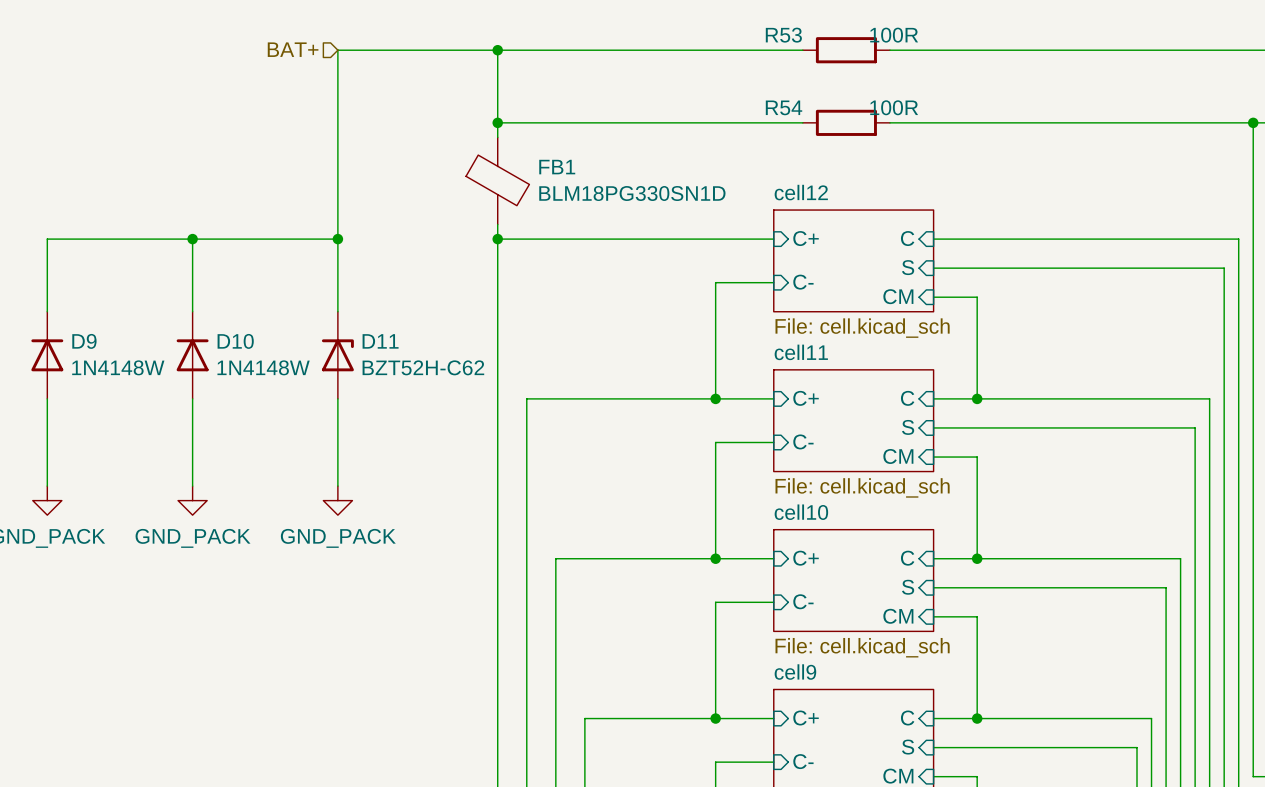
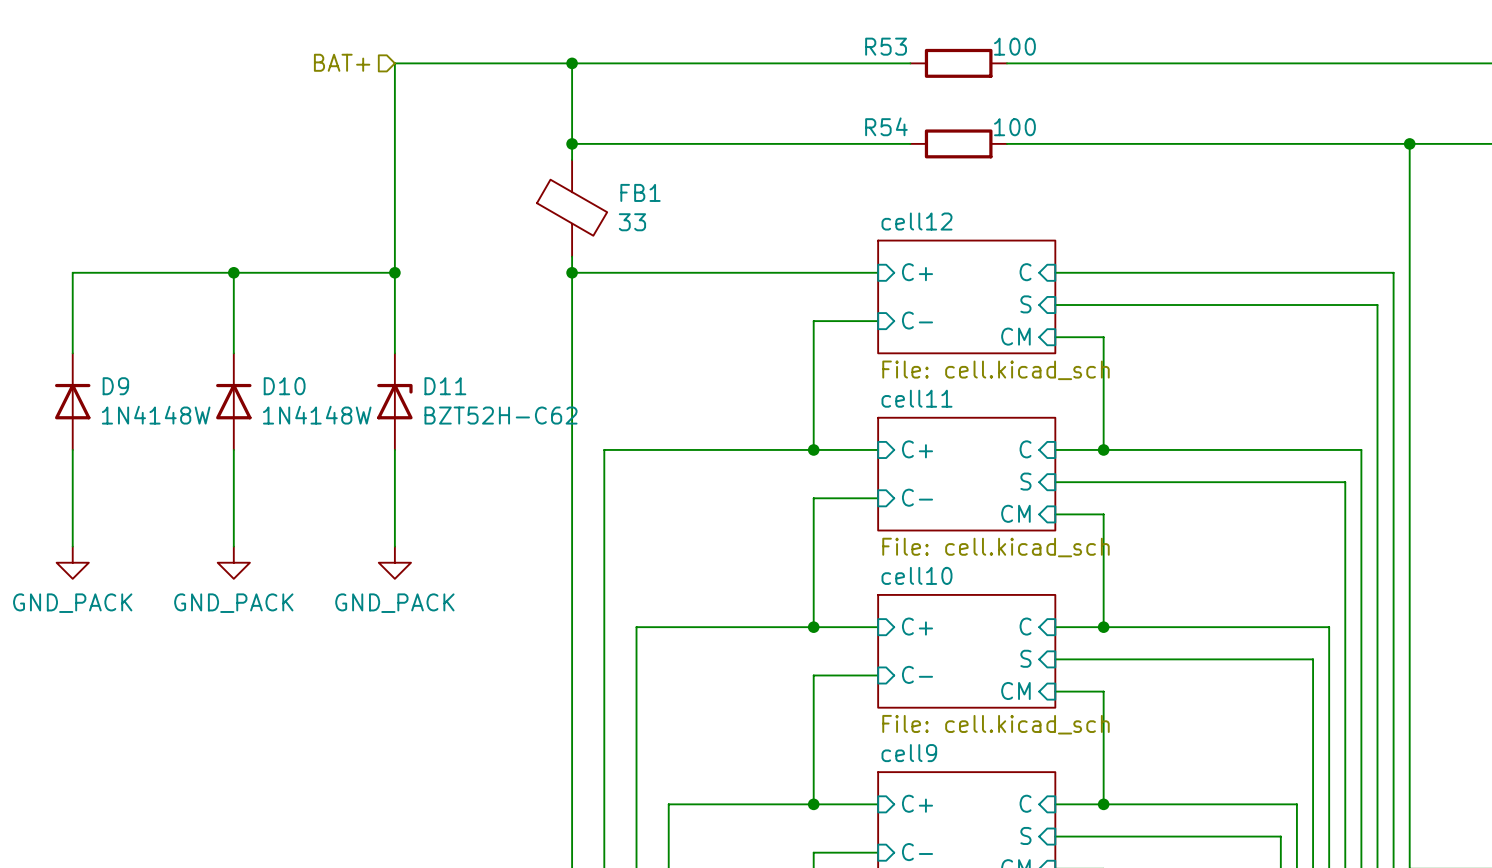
R53 value: 100R (894, 35) -> 100 (1014, 46)
R54 value: 100R (894, 107) -> 100 (1014, 127)
FB1 value: BLM18PG330SN1D (632, 193) -> 33 (632, 222)

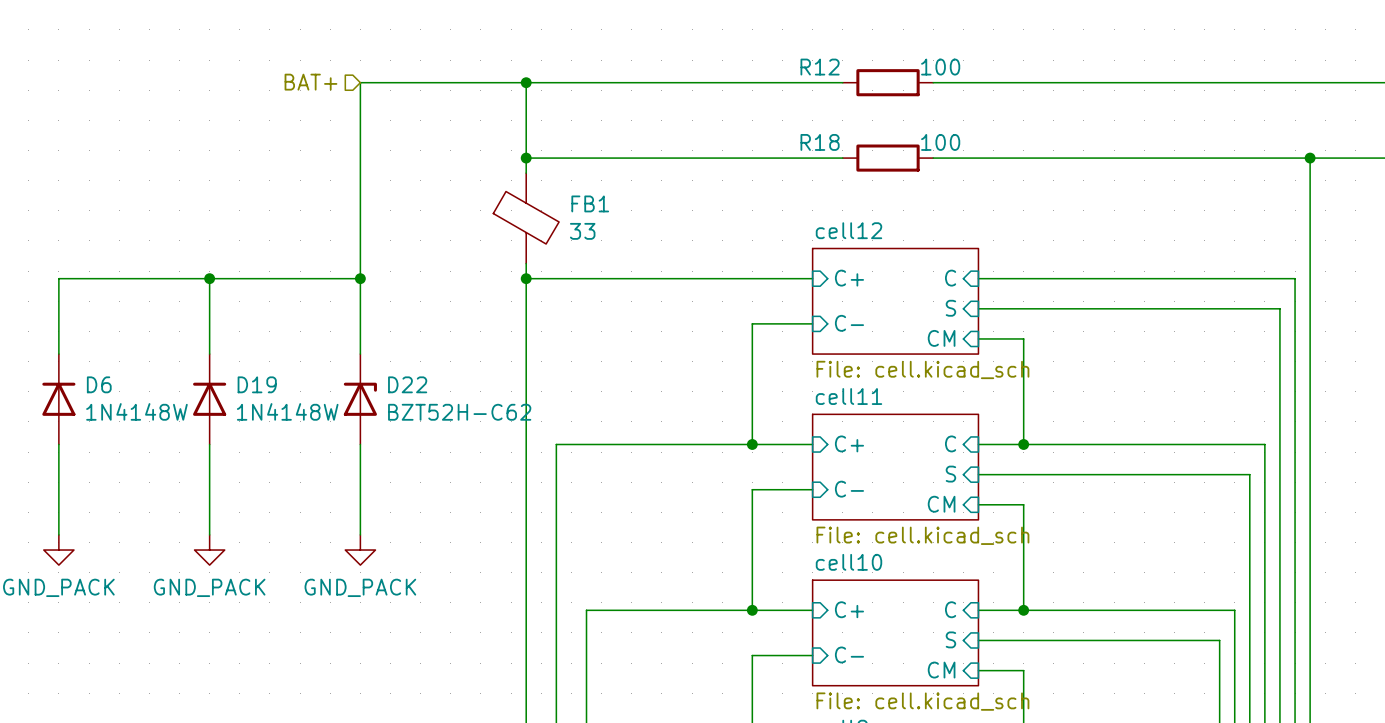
R53 name: R53 (886, 46) -> R12 (820, 67)
R54 name: R54 (886, 126) -> R18 (820, 142)
D9 name: D9 (115, 386) -> D6 (99, 384)
D10 name: D10 (284, 386) -> D19 (257, 384)
D11 name: D11 (445, 386) -> D22 (407, 384)

